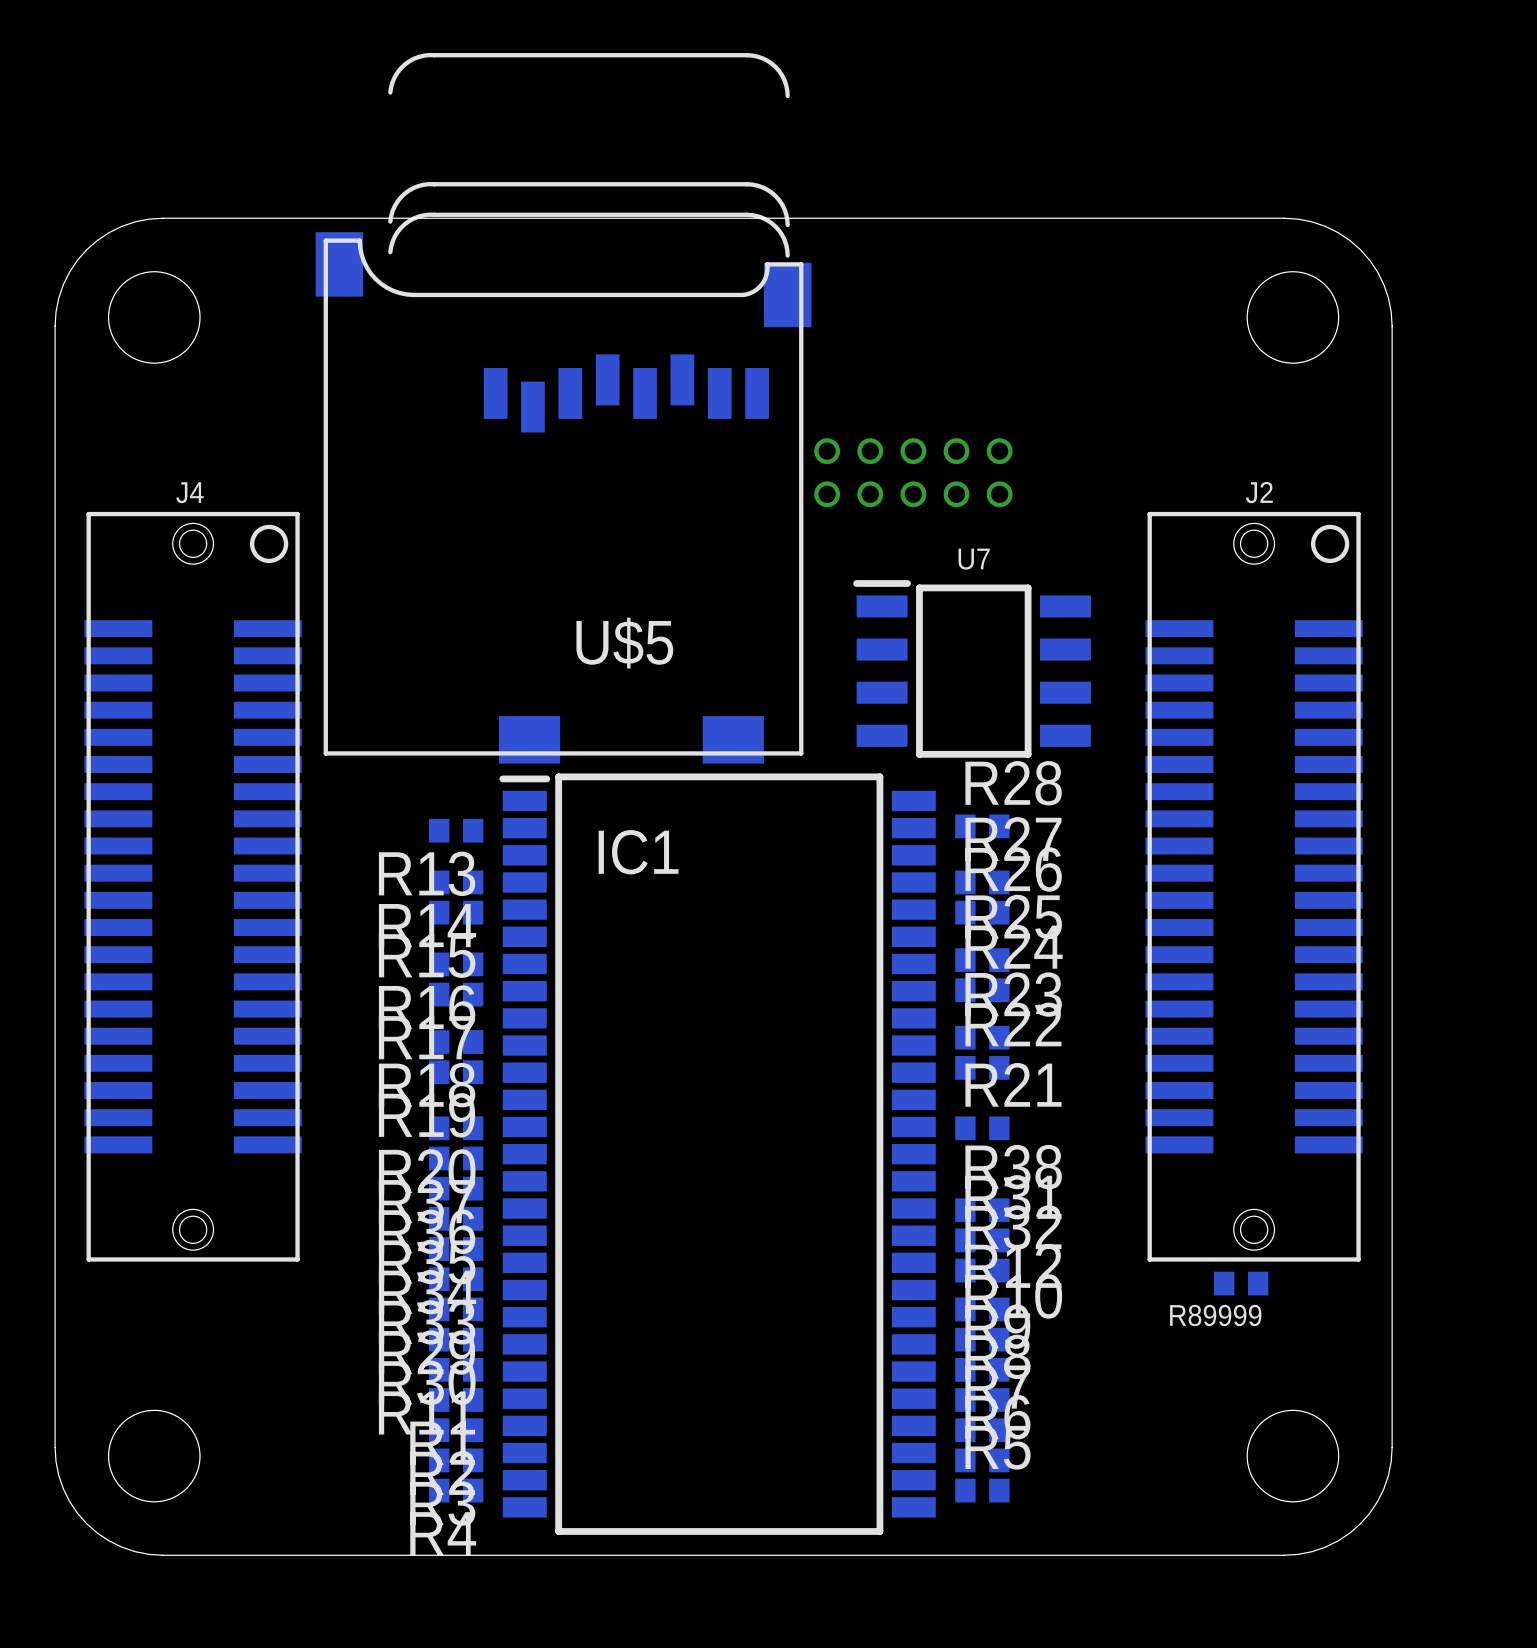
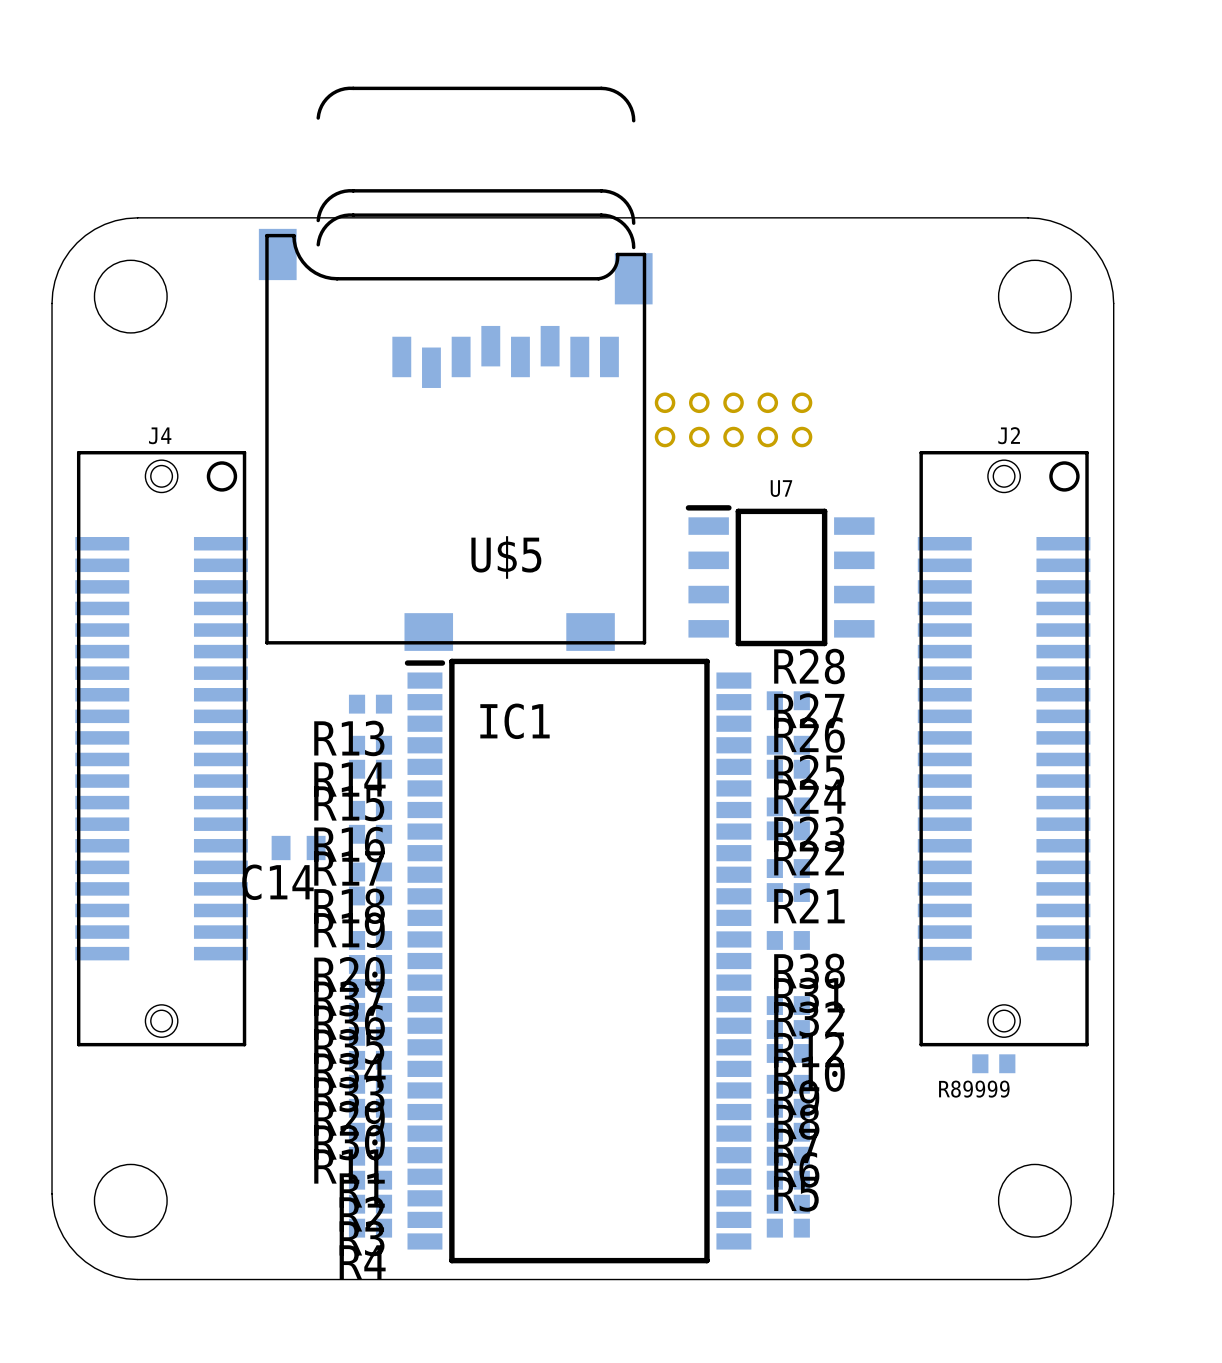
C14: none -> (298, 848)

